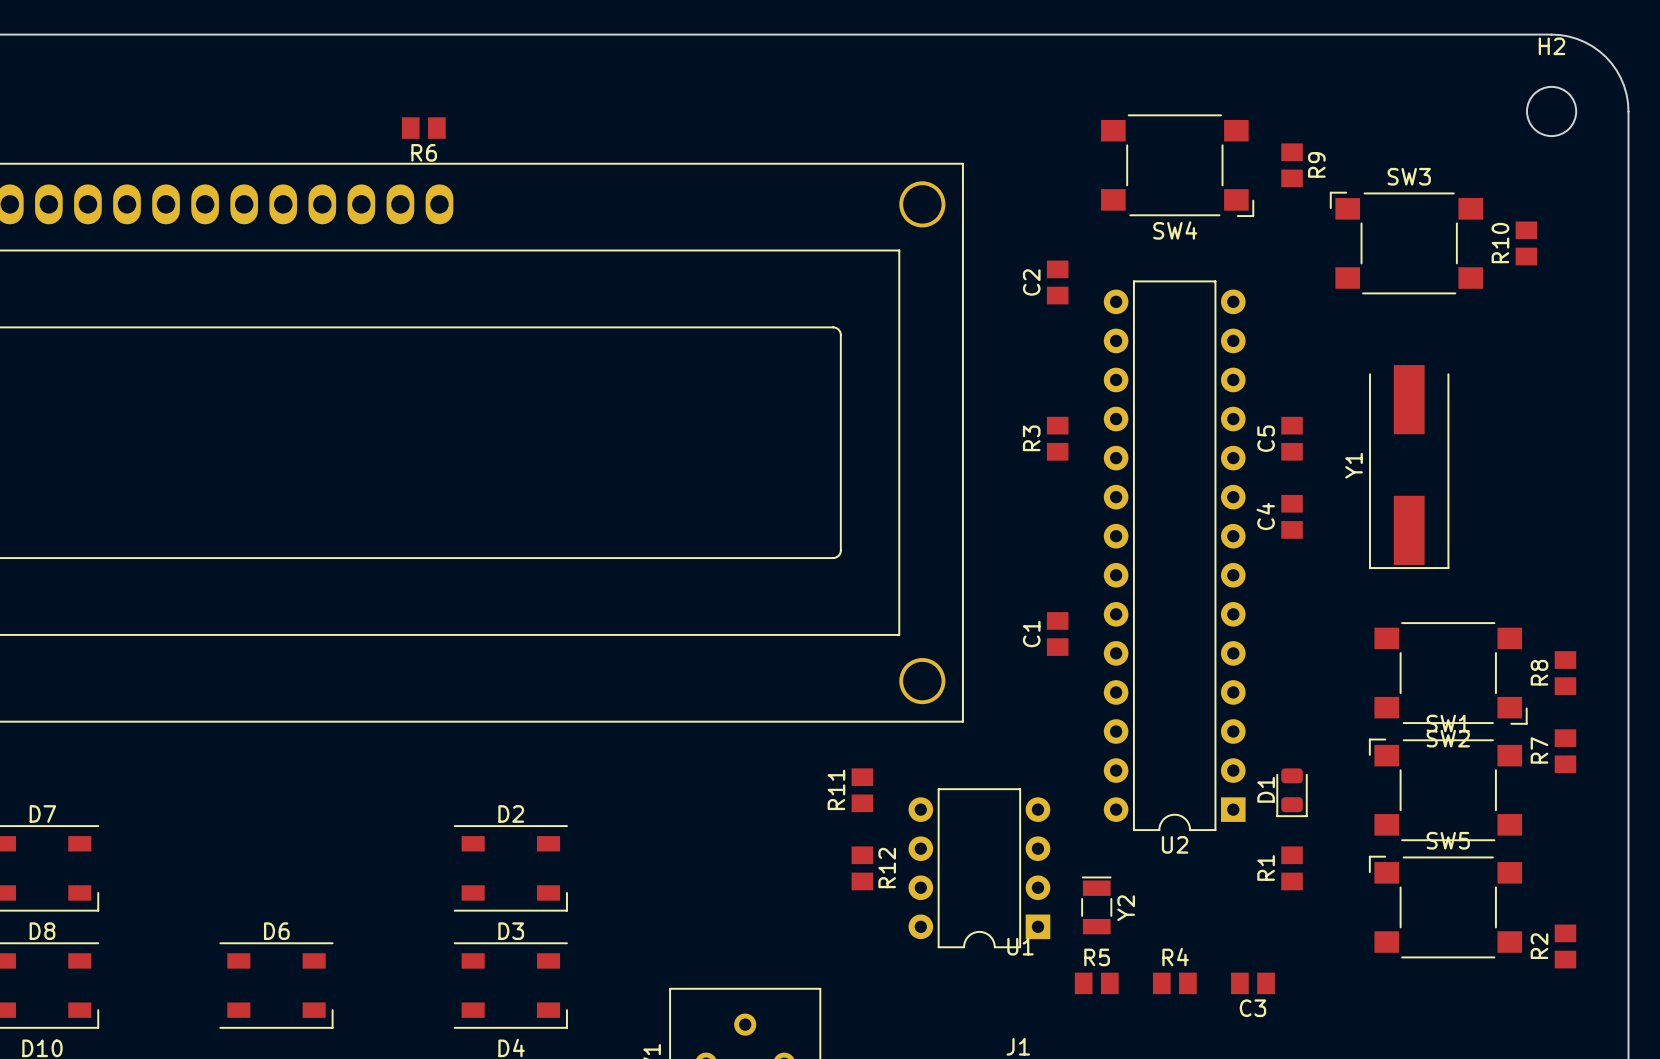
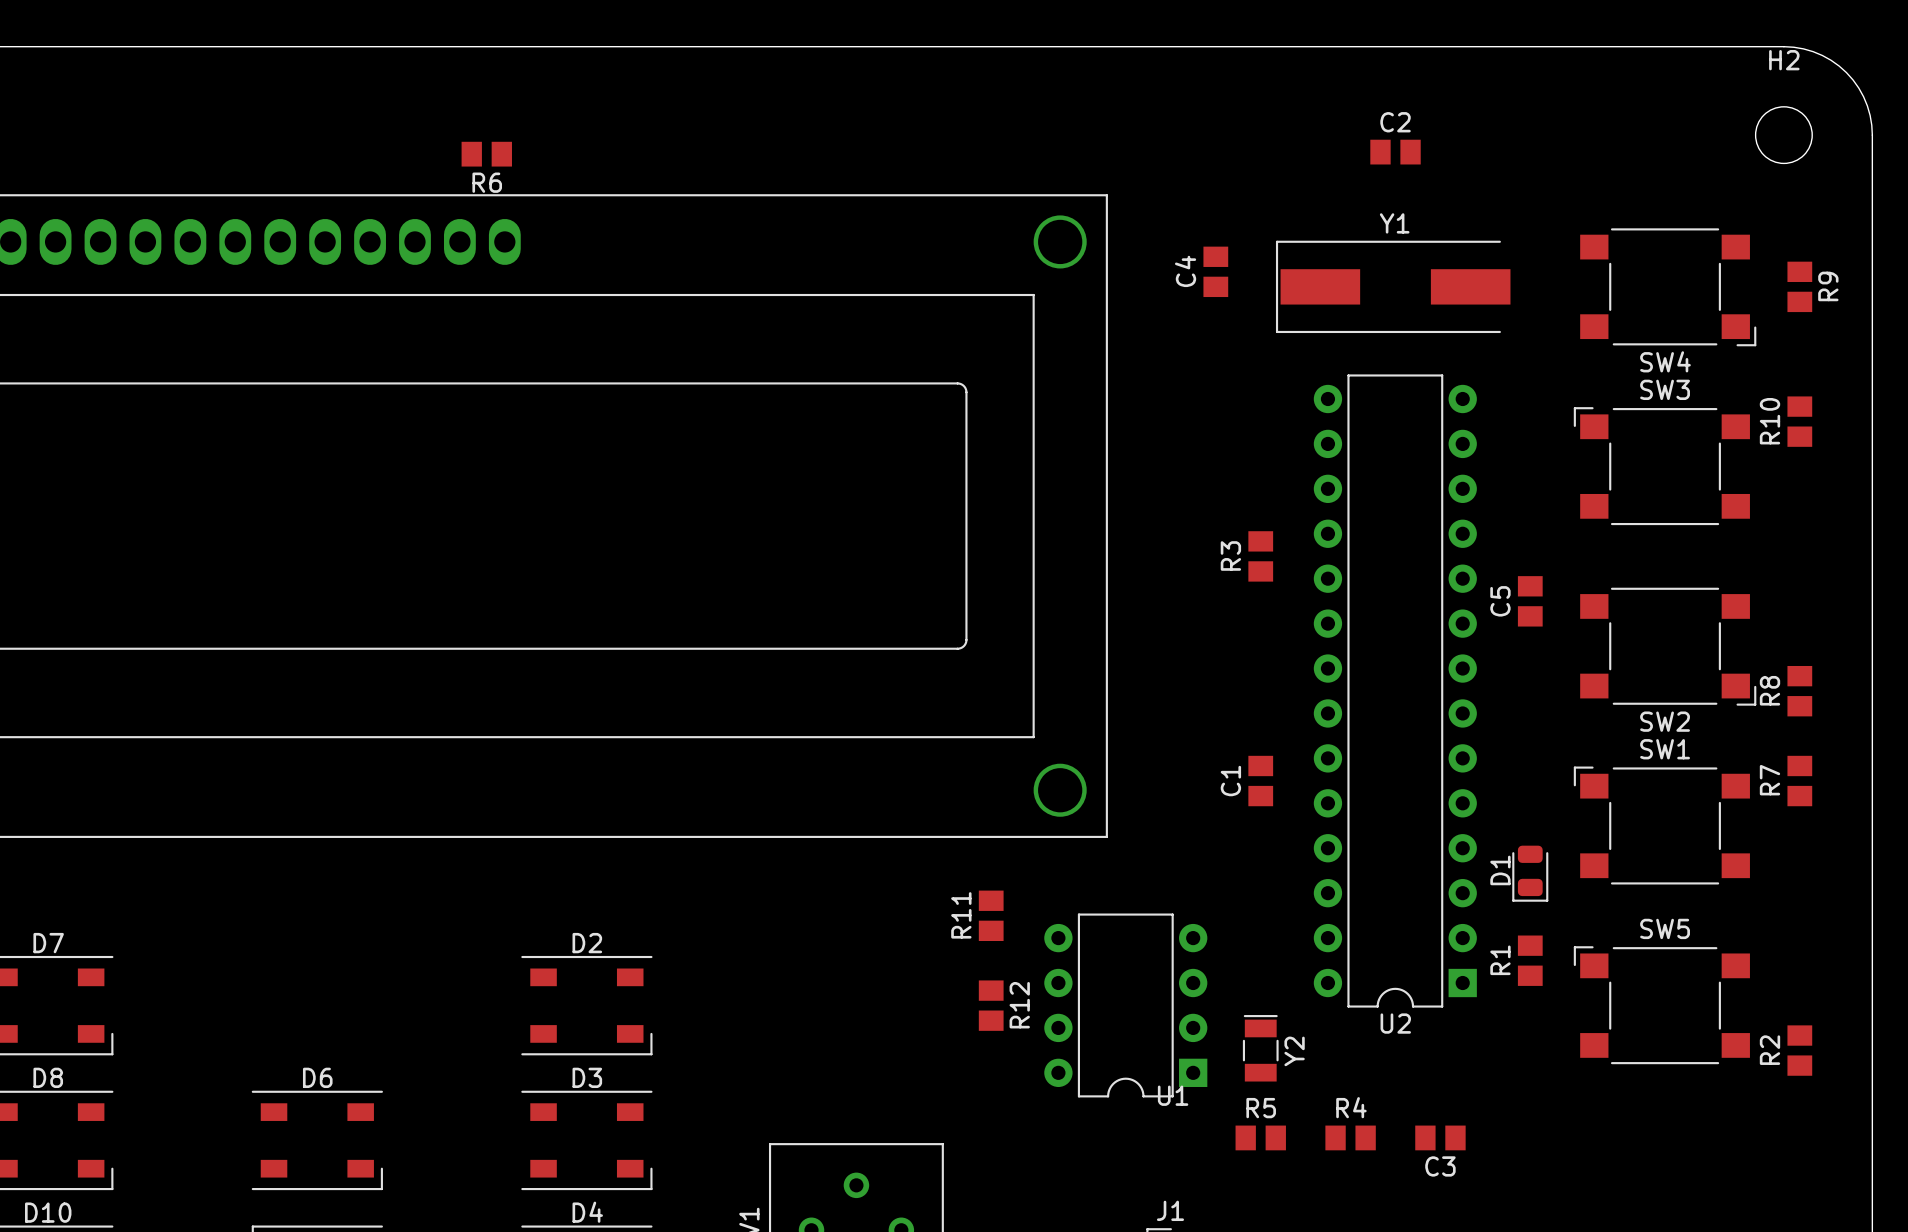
SW4 position: (1177, 165) -> (1668, 287)
R9 position: (1292, 165) -> (1799, 286)
SW3 position: (1406, 243) -> (1661, 466)
R10 position: (1526, 243) -> (1799, 421)
C2 rotation: 0° (1057, 282) -> 90° clockwise (1395, 152)
C2 position: (1057, 282) -> (1395, 152)
R3 position: (1057, 438) -> (1260, 556)
C5 position: (1292, 438) -> (1530, 601)
Y1 rotation: 0° (1409, 467) -> 90° clockwise (1393, 286)
Y1 position: (1409, 467) -> (1393, 286)
C4 position: (1292, 516) -> (1215, 271)
U2 position: (1174, 555) -> (1395, 691)
R8: none -> (1799, 691)
C1 position: (1057, 634) -> (1260, 781)
R8 name: R8 (1539, 672) -> R7 (1769, 780)
SW2 position: (1451, 673) -> (1668, 646)
R7: (1565, 751) -> none
SW1 position: (1445, 789) -> (1661, 825)
D1 position: (1292, 792) -> (1530, 873)
R1 position: (1292, 868) -> (1530, 960)
SW5 position: (1445, 907) -> (1661, 1005)
R2 position: (1565, 946) -> (1799, 1050)

